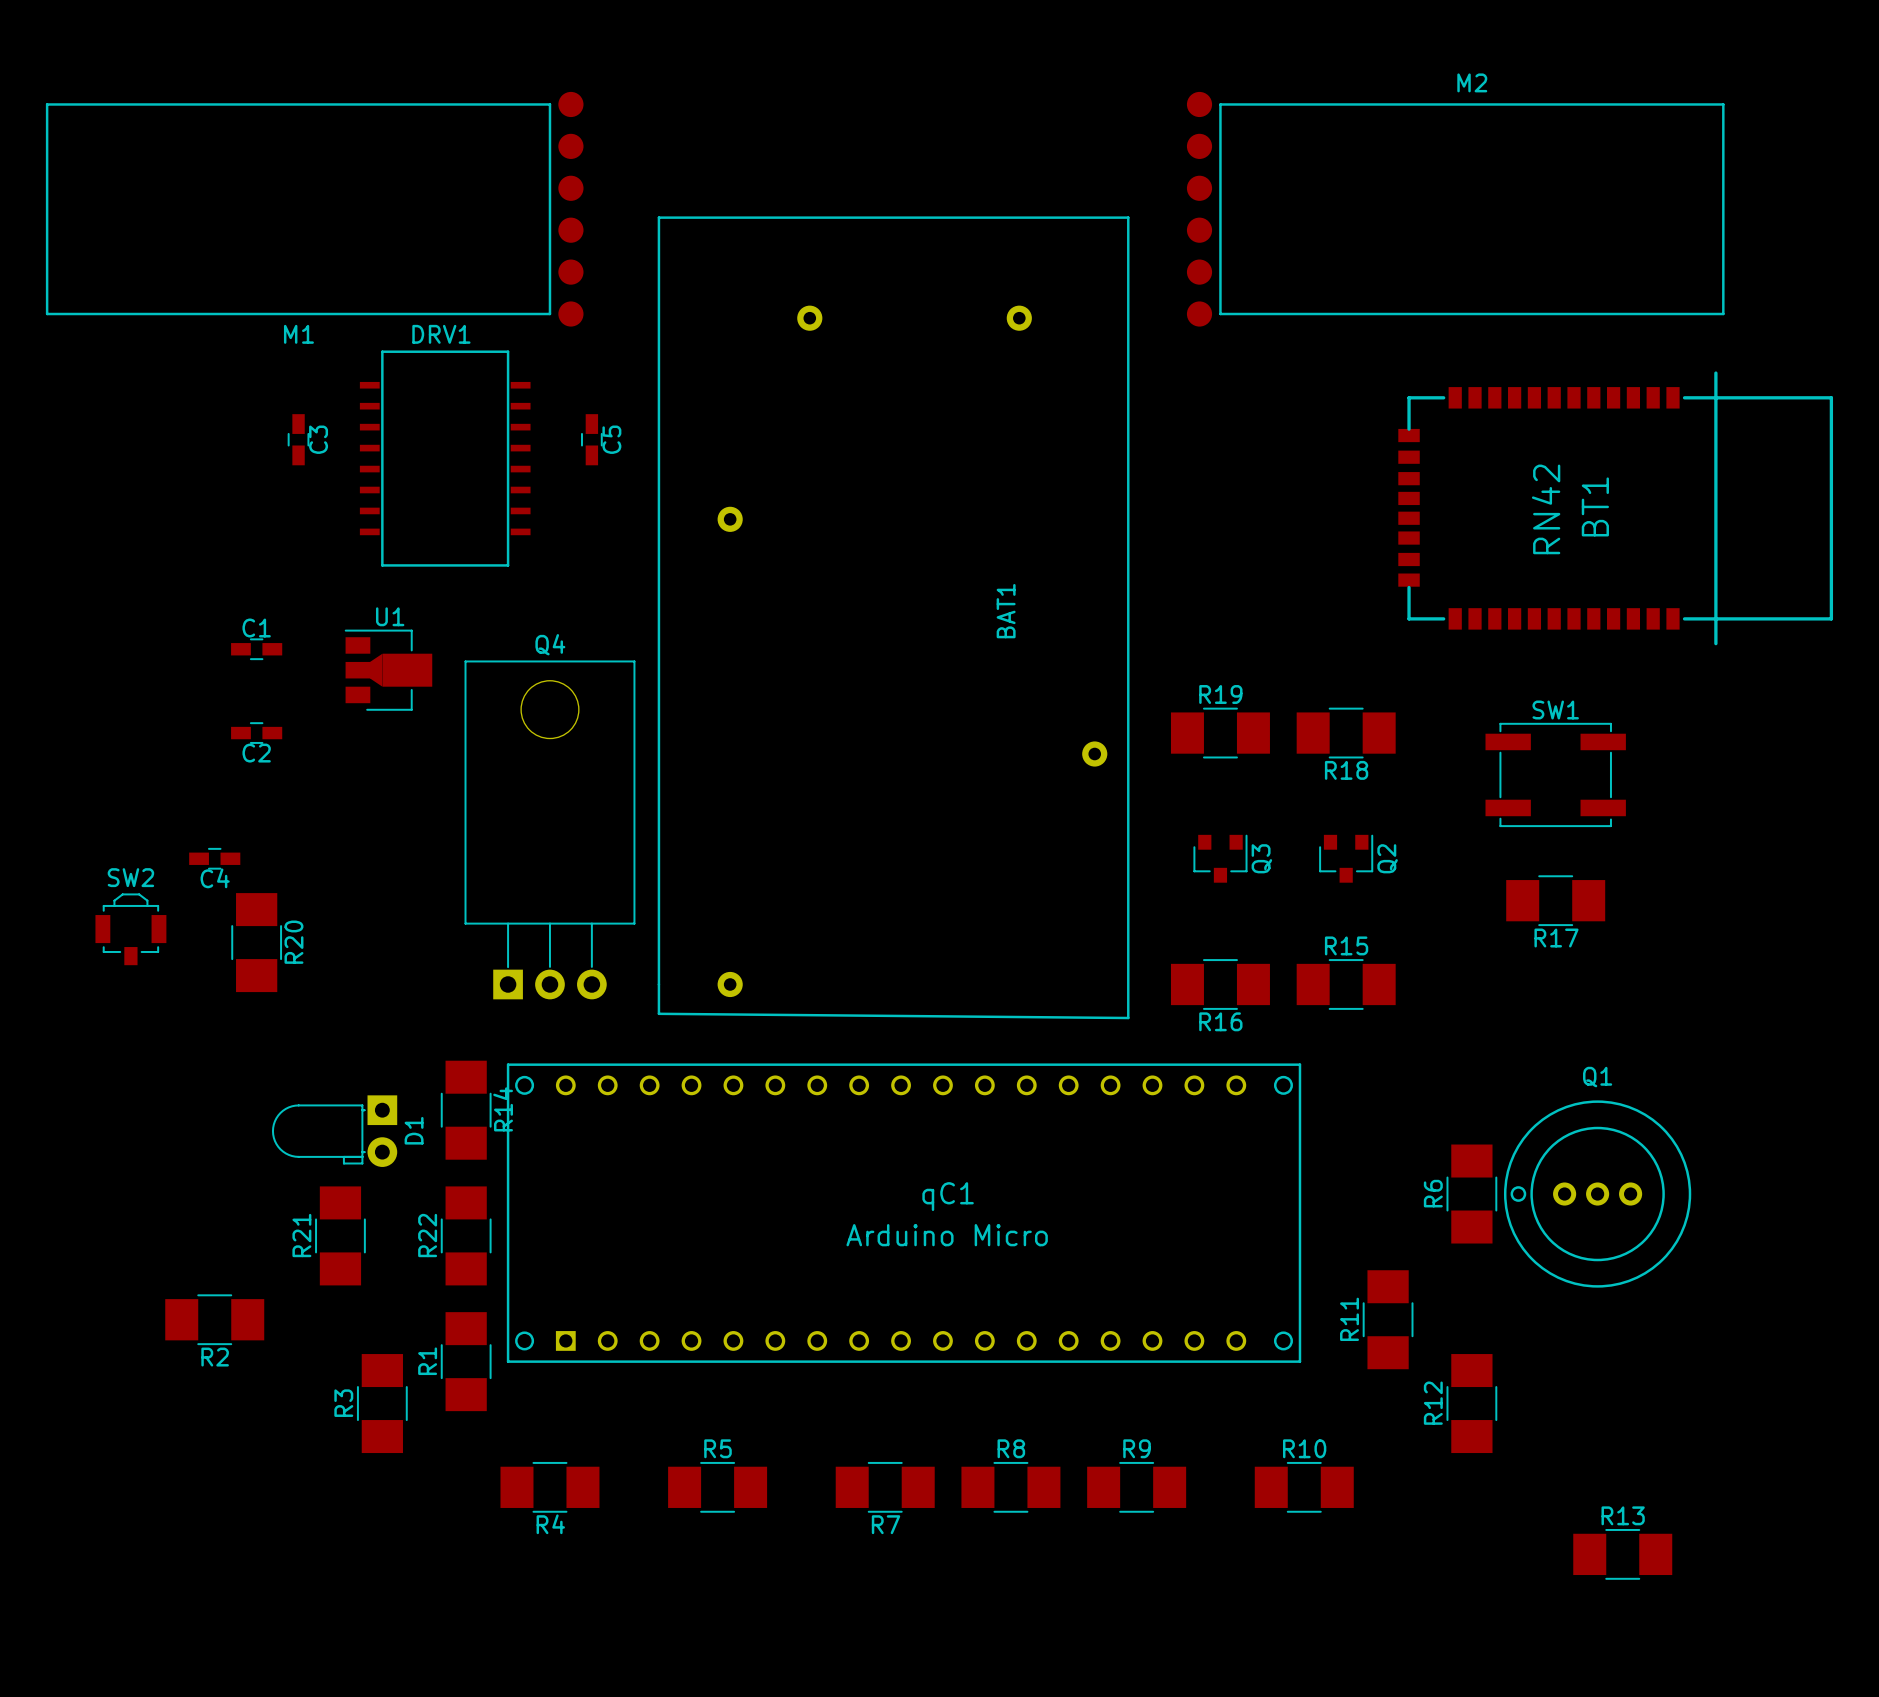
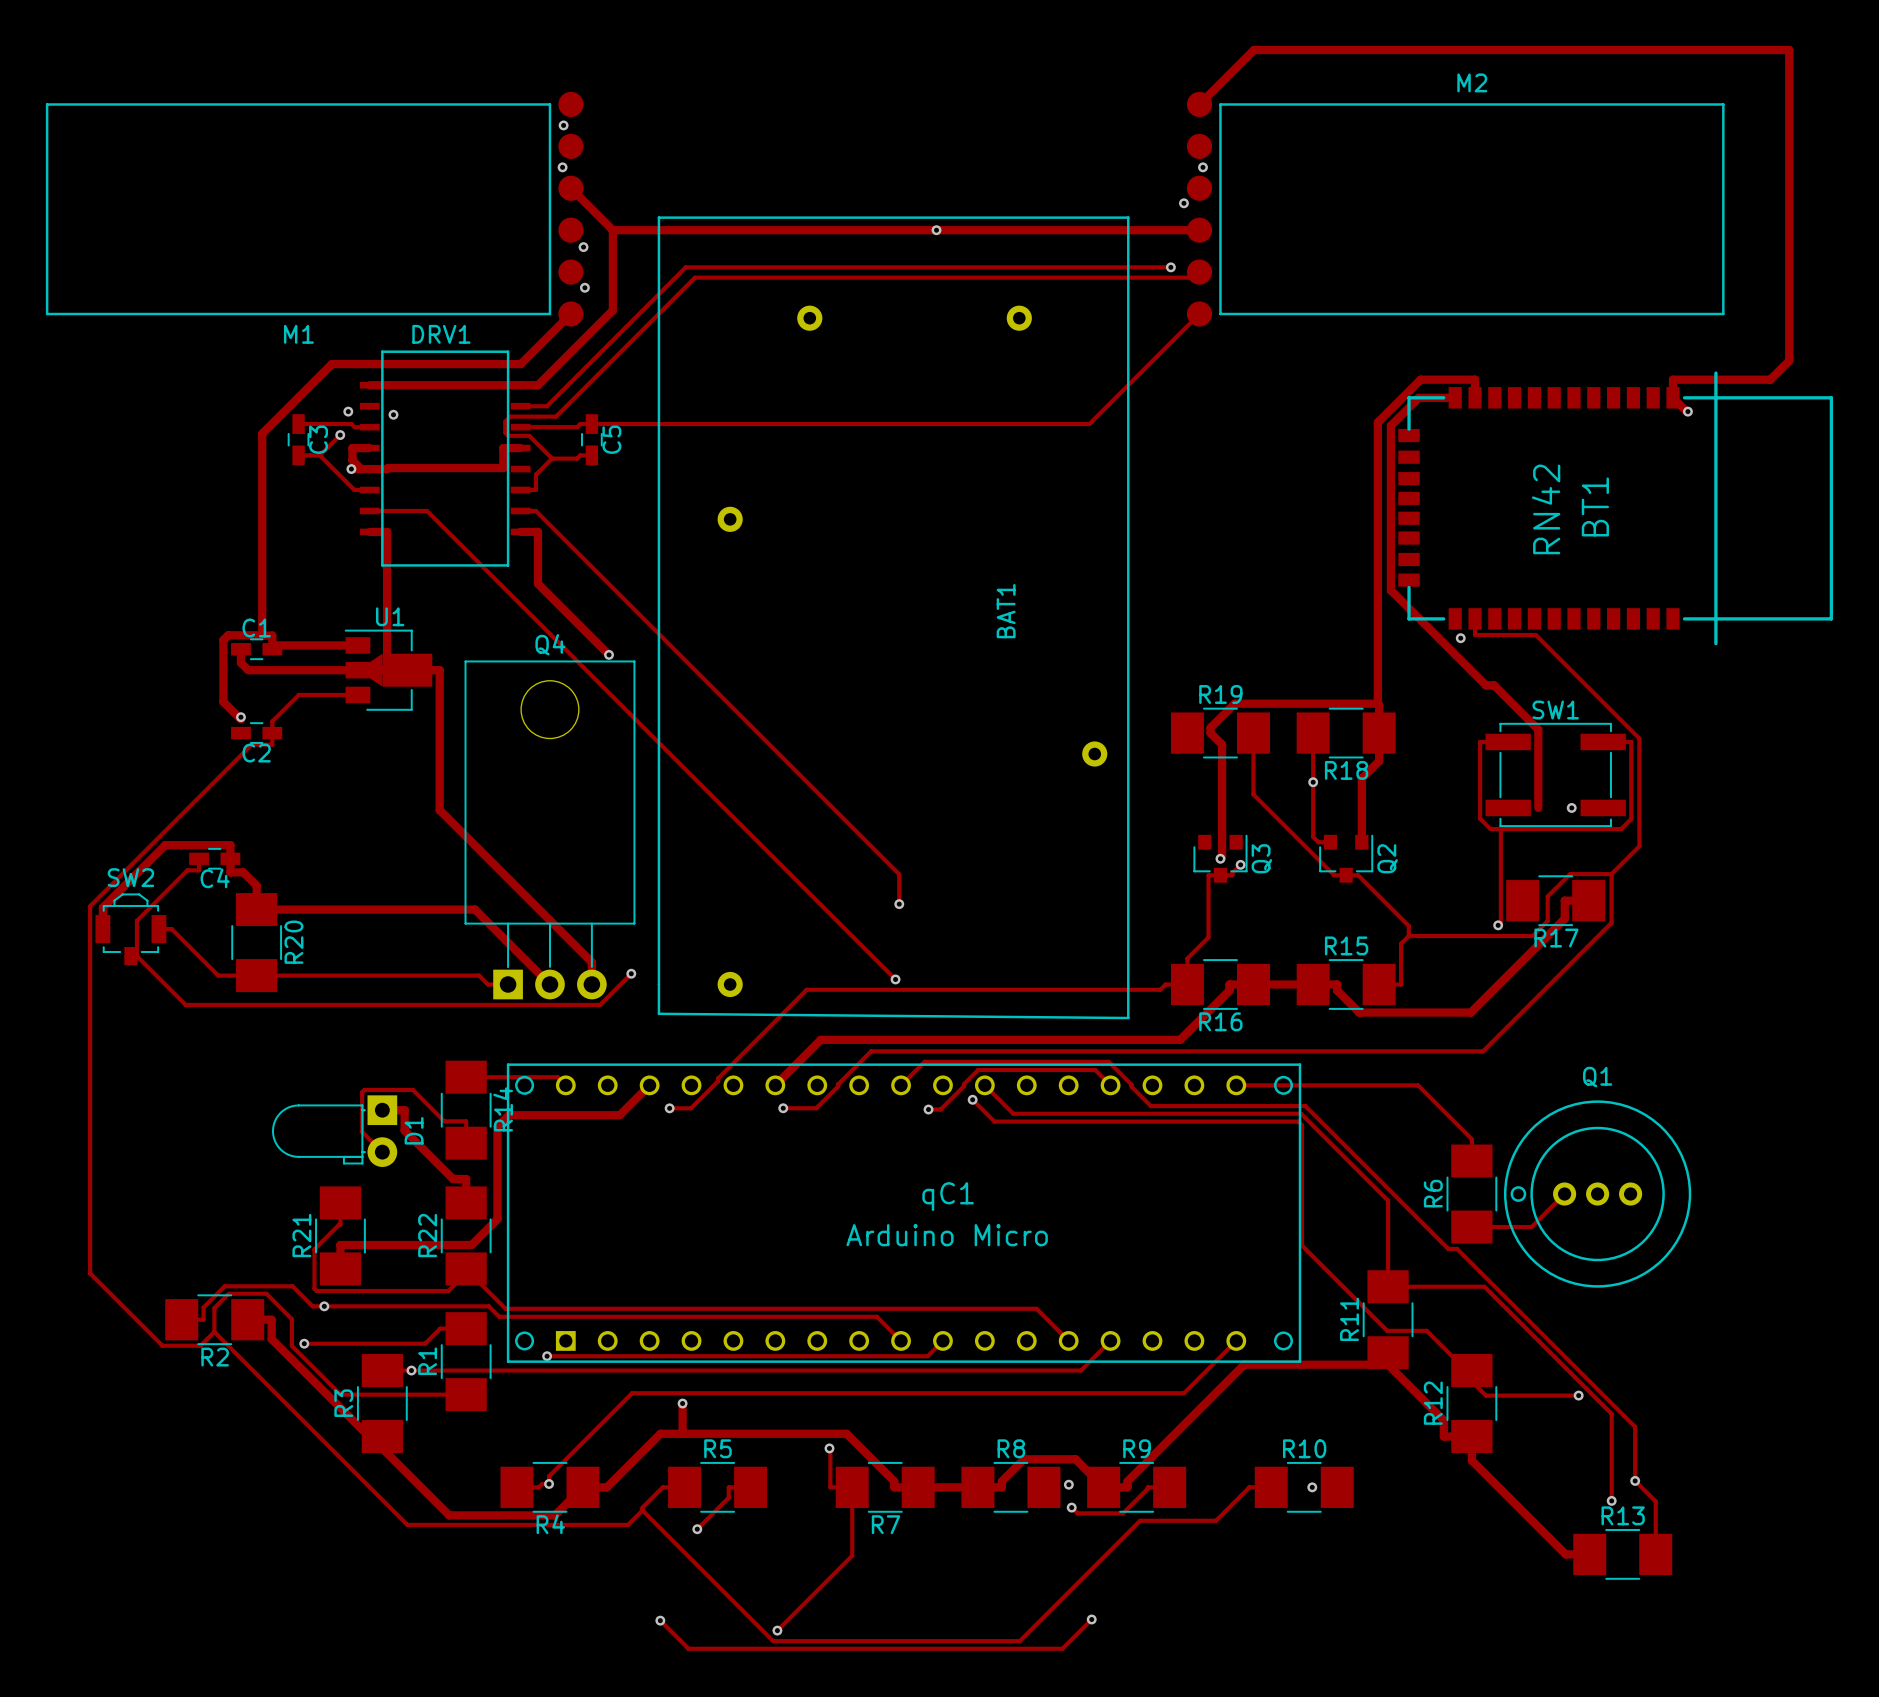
track: none -> (1199, 104) (1253, 50) (1789, 50) (1789, 360) (1770, 379) (1673, 379) (1673, 397) (1687, 411)
via: none -> (563, 125)
via: none -> (562, 167)
via: none -> (1202, 167)
track: none -> (570, 188) (612, 230)
via: none -> (1183, 203)
track: none -> (612, 230) (1199, 230)
track: none -> (612, 230) (612, 310) (537, 385) (369, 385)
via: none -> (936, 230)
via: none -> (583, 247)
track: none -> (1170, 267) (685, 267) (546, 406) (520, 406)
via: none -> (1170, 267)
track: none -> (1199, 272) (1193, 277) (694, 277) (556, 416) (510, 416) (505, 421) (505, 432) (508, 435) (529, 435) (552, 458)
via: none -> (584, 287)
track: none -> (570, 314) (520, 364) (331, 364) (262, 433) (262, 635)
track: none -> (1199, 314) (1089, 424) (580, 424) (577, 427) (520, 427)
track: none -> (1455, 397) (1418, 397) (1390, 425) (1390, 590) (1485, 685) (1494, 685) (1538, 729) (1538, 807)
track: none -> (1475, 397) (1475, 379) (1420, 379) (1377, 422) (1377, 703)
via: none -> (348, 411)
via: none -> (1687, 411)
via: none -> (393, 414)
track: none -> (298, 424) (351, 424) (354, 427) (369, 427)
track: none -> (340, 435) (319, 455)
via: none -> (340, 435)
track: none -> (369, 448) (352, 448) (352, 460) (361, 469)
track: none -> (520, 448) (503, 448) (503, 468) (351, 469)
track: none -> (298, 455) (319, 455)
track: none -> (319, 455) (354, 490) (369, 490)
track: none -> (591, 455) (580, 455) (577, 458) (552, 458)
track: none -> (552, 458) (535, 474) (535, 490) (520, 490)
via: none -> (351, 469)
track: none -> (369, 510) (427, 510) (895, 979)
track: none -> (520, 510) (535, 510) (899, 874) (899, 904)
track: none -> (369, 531) (387, 531) (387, 670)
track: none -> (520, 531) (537, 531) (537, 583) (609, 654)
track: none -> (1475, 618) (1475, 634) (1535, 634) (1639, 738) (1639, 846) (1611, 874)
track: none -> (262, 635) (228, 635) (223, 640) (223, 701) (240, 719)
track: none -> (262, 635) (272, 635) (272, 649)
via: none -> (1460, 638)
track: none -> (272, 645) (357, 645)
track: none -> (240, 649) (240, 662) (248, 670) (439, 670) (439, 810) (591, 962) (591, 984)
via: none -> (609, 654)
track: none -> (357, 694) (298, 694) (272, 721) (272, 744) (251, 744) (90, 906) (90, 1273) (162, 1345) (200, 1345) (214, 1331)
track: none -> (1377, 703) (1379, 761) (1361, 778) (1361, 842)
track: none -> (1377, 703) (1234, 703) (1210, 727) (1210, 733) (1222, 744) (1222, 857) (1220, 858)
via: none -> (240, 717)
track: none -> (1253, 733) (1253, 794) (1334, 875) (1358, 875) (1408, 925) (1408, 936)
track: none -> (1313, 733) (1313, 836) (1318, 842) (1330, 842)
track: none -> (1508, 741) (1480, 741) (1480, 818) (1490, 829) (1621, 829) (1631, 818) (1631, 741) (1603, 741)
via: none -> (1313, 782)
via: none -> (1571, 807)
track: none -> (1500, 829) (1500, 922) (1498, 925)
track: none -> (199, 858) (199, 870) (187, 870) (136, 920) (136, 956)
via: none -> (1220, 858)
track: none -> (1240, 864) (1232, 875) (1208, 875) (1208, 937) (1187, 958) (1187, 984) (1165, 984) (1160, 989) (806, 989) (690, 1108) (669, 1108)
via: none -> (1240, 864)
track: none -> (1611, 874) (1611, 922) (1483, 1051) (871, 1051) (816, 1108) (783, 1108)
track: none -> (1611, 874) (1570, 874) (1547, 896) (1547, 921) (1532, 936) (1408, 936)
track: none -> (1588, 900) (1564, 900) (1564, 918) (1470, 1012) (1359, 1012) (1337, 990) (1337, 984) (1229, 984) (1229, 990) (1180, 1039) (820, 1039) (775, 1085)
via: none -> (899, 904)
via: none -> (1498, 925)
track: none -> (102, 929) (102, 907) (165, 845) (230, 845) (230, 872) (243, 872) (256, 885) (256, 909) (475, 909) (549, 984)
track: none -> (158, 929) (171, 929) (218, 975) (478, 975) (487, 984) (508, 984)
track: none -> (1408, 936) (1401, 943) (1401, 984) (1379, 984)
track: none -> (136, 956) (185, 1004) (600, 1004) (631, 973)
via: none -> (631, 973)
via: none -> (895, 979)
track: none -> (466, 1077) (557, 1077) (565, 1085)
track: none -> (649, 1085) (619, 1115) (508, 1115) (497, 1126) (497, 1219) (471, 1244) (340, 1244) (340, 1268)
track: none -> (901, 1085) (924, 1061) (1108, 1061) (1150, 1106) (1305, 1106) (1448, 1248) (1457, 1248) (1635, 1426) (1635, 1480) (1655, 1501) (1655, 1554)
track: none -> (984, 1085) (1013, 1113) (1301, 1113) (1388, 1200) (1388, 1286) (1484, 1286) (1611, 1413) (1611, 1500)
track: none -> (1110, 1085) (1095, 1069) (978, 1069) (940, 1109) (928, 1109)
track: none -> (1236, 1085) (1418, 1085) (1471, 1139) (1471, 1161)
track: none -> (972, 1099) (994, 1121) (1298, 1121) (1301, 1125) (1301, 1245) (1387, 1330) (1426, 1330) (1471, 1376)
via: none -> (972, 1099)
via: none -> (669, 1108)
via: none -> (783, 1108)
via: none -> (928, 1109)
track: none -> (382, 1110) (404, 1110) (404, 1130) (453, 1178) (466, 1178) (466, 1202)
track: none -> (466, 1143) (466, 1121) (444, 1121) (412, 1089) (364, 1089) (362, 1092) (362, 1131) (382, 1152)
track: none -> (1564, 1194) (1531, 1227) (1471, 1227)
track: none -> (340, 1202) (340, 1224) (314, 1249) (314, 1288) (316, 1290) (448, 1290) (466, 1273)
track: none -> (466, 1273) (470, 1273) (505, 1308) (1036, 1308) (1068, 1340)
via: none -> (324, 1306)
track: none -> (181, 1319) (203, 1319) (203, 1307) (224, 1286) (292, 1286) (312, 1306) (488, 1306) (499, 1316) (876, 1316) (901, 1340)
track: none -> (247, 1319) (271, 1319) (271, 1339) (382, 1448)
track: none -> (466, 1328) (440, 1328) (425, 1343) (304, 1343)
track: none -> (214, 1331) (407, 1524) (628, 1524) (642, 1510)
track: none -> (214, 1331) (214, 1308) (228, 1293) (266, 1293) (291, 1319) (291, 1345) (340, 1394) (466, 1394)
track: none -> (942, 1340) (927, 1356) (547, 1356)
track: none -> (1110, 1340) (1080, 1370) (382, 1370)
track: none -> (1236, 1340) (1184, 1393) (632, 1393) (549, 1476) (549, 1483) (542, 1483) (538, 1487) (516, 1487)
via: none -> (304, 1343)
via: none -> (547, 1356)
track: none -> (1388, 1364) (1244, 1364) (1127, 1481) (1127, 1487) (1103, 1487) (1075, 1459) (1023, 1459) (1001, 1481) (1001, 1487) (894, 1487) (894, 1481) (846, 1433) (660, 1433) (606, 1487) (582, 1487) (554, 1515) (449, 1515) (382, 1448)
track: none -> (1388, 1364) (1443, 1420) (1443, 1436) (1471, 1436) (1471, 1460) (1565, 1554) (1589, 1554)
via: none -> (411, 1370)
track: none -> (1471, 1370) (1471, 1381) (1486, 1395) (1578, 1395)
via: none -> (1578, 1395)
track: none -> (682, 1403) (682, 1433)
via: none -> (682, 1403)
track: none -> (829, 1448) (830, 1487) (852, 1487) (852, 1555) (777, 1630)
via: none -> (829, 1448)
via: none -> (1635, 1480)
via: none -> (549, 1483)
via: none -> (1068, 1484)
track: none -> (684, 1487) (662, 1487) (642, 1507) (642, 1510)
track: none -> (750, 1487) (728, 1487) (728, 1497) (697, 1529)
track: none -> (1169, 1487) (1147, 1487) (1123, 1513) (1077, 1513) (1071, 1507)
track: none -> (1271, 1487) (1249, 1487) (1215, 1520) (1140, 1520) (1019, 1641) (773, 1641) (642, 1510)
via: none -> (1312, 1487)
via: none -> (1611, 1500)
via: none -> (1071, 1507)
via: none -> (697, 1529)
track: none -> (1091, 1619) (1062, 1648) (688, 1648) (660, 1620)
via: none -> (1091, 1619)
via: none -> (660, 1620)
via: none -> (777, 1630)

